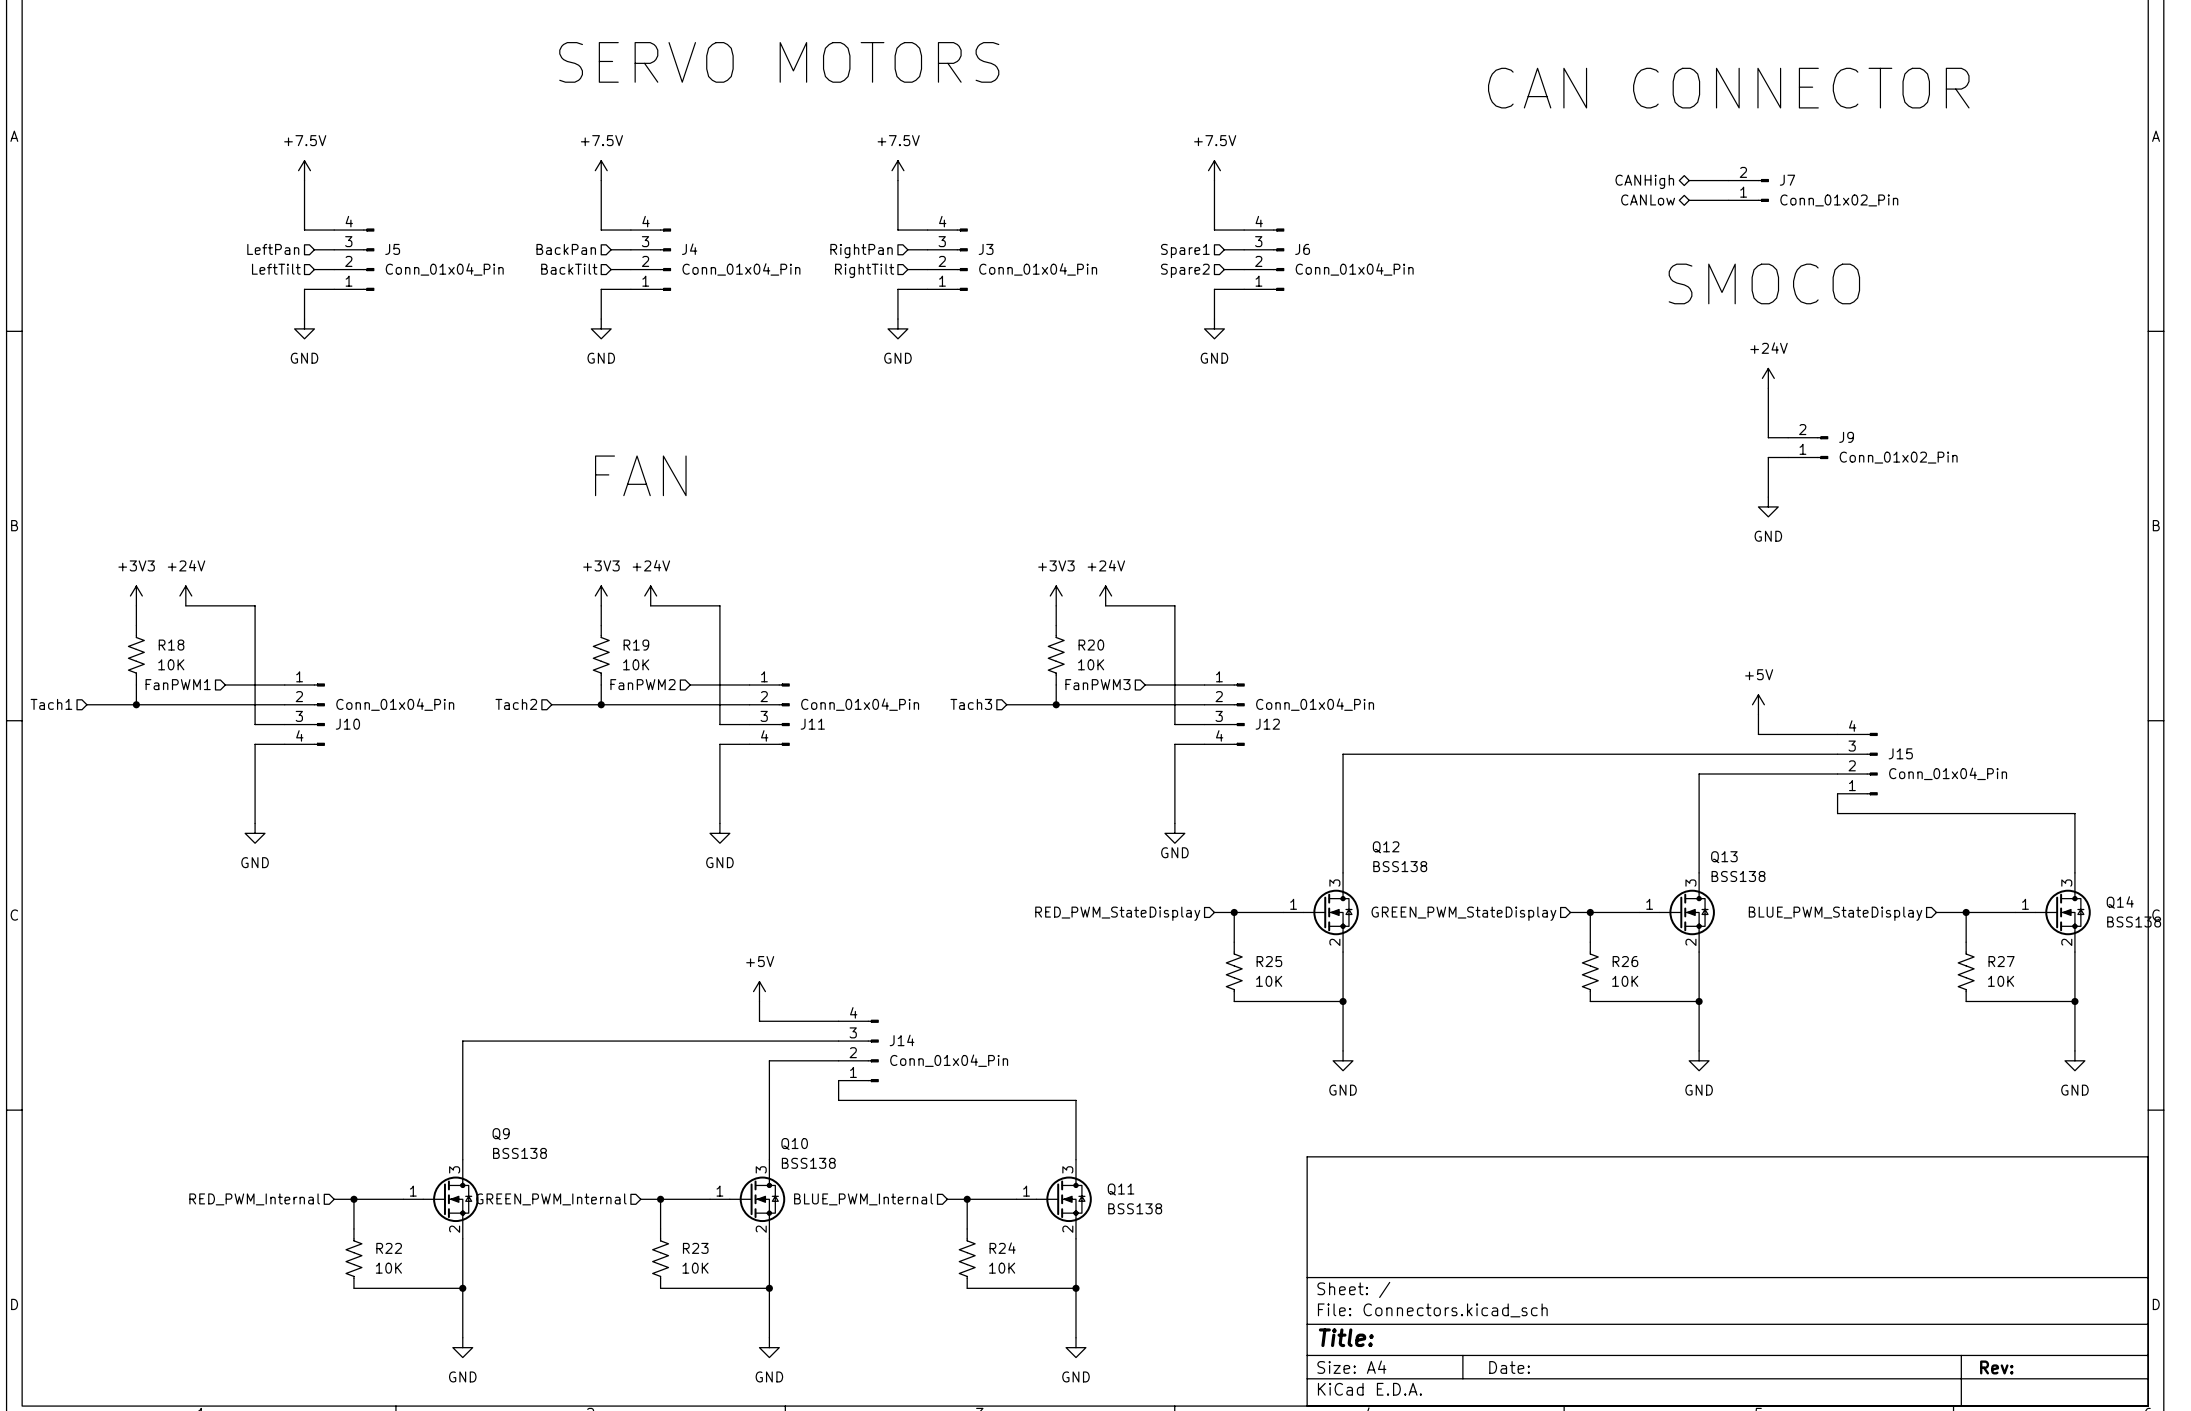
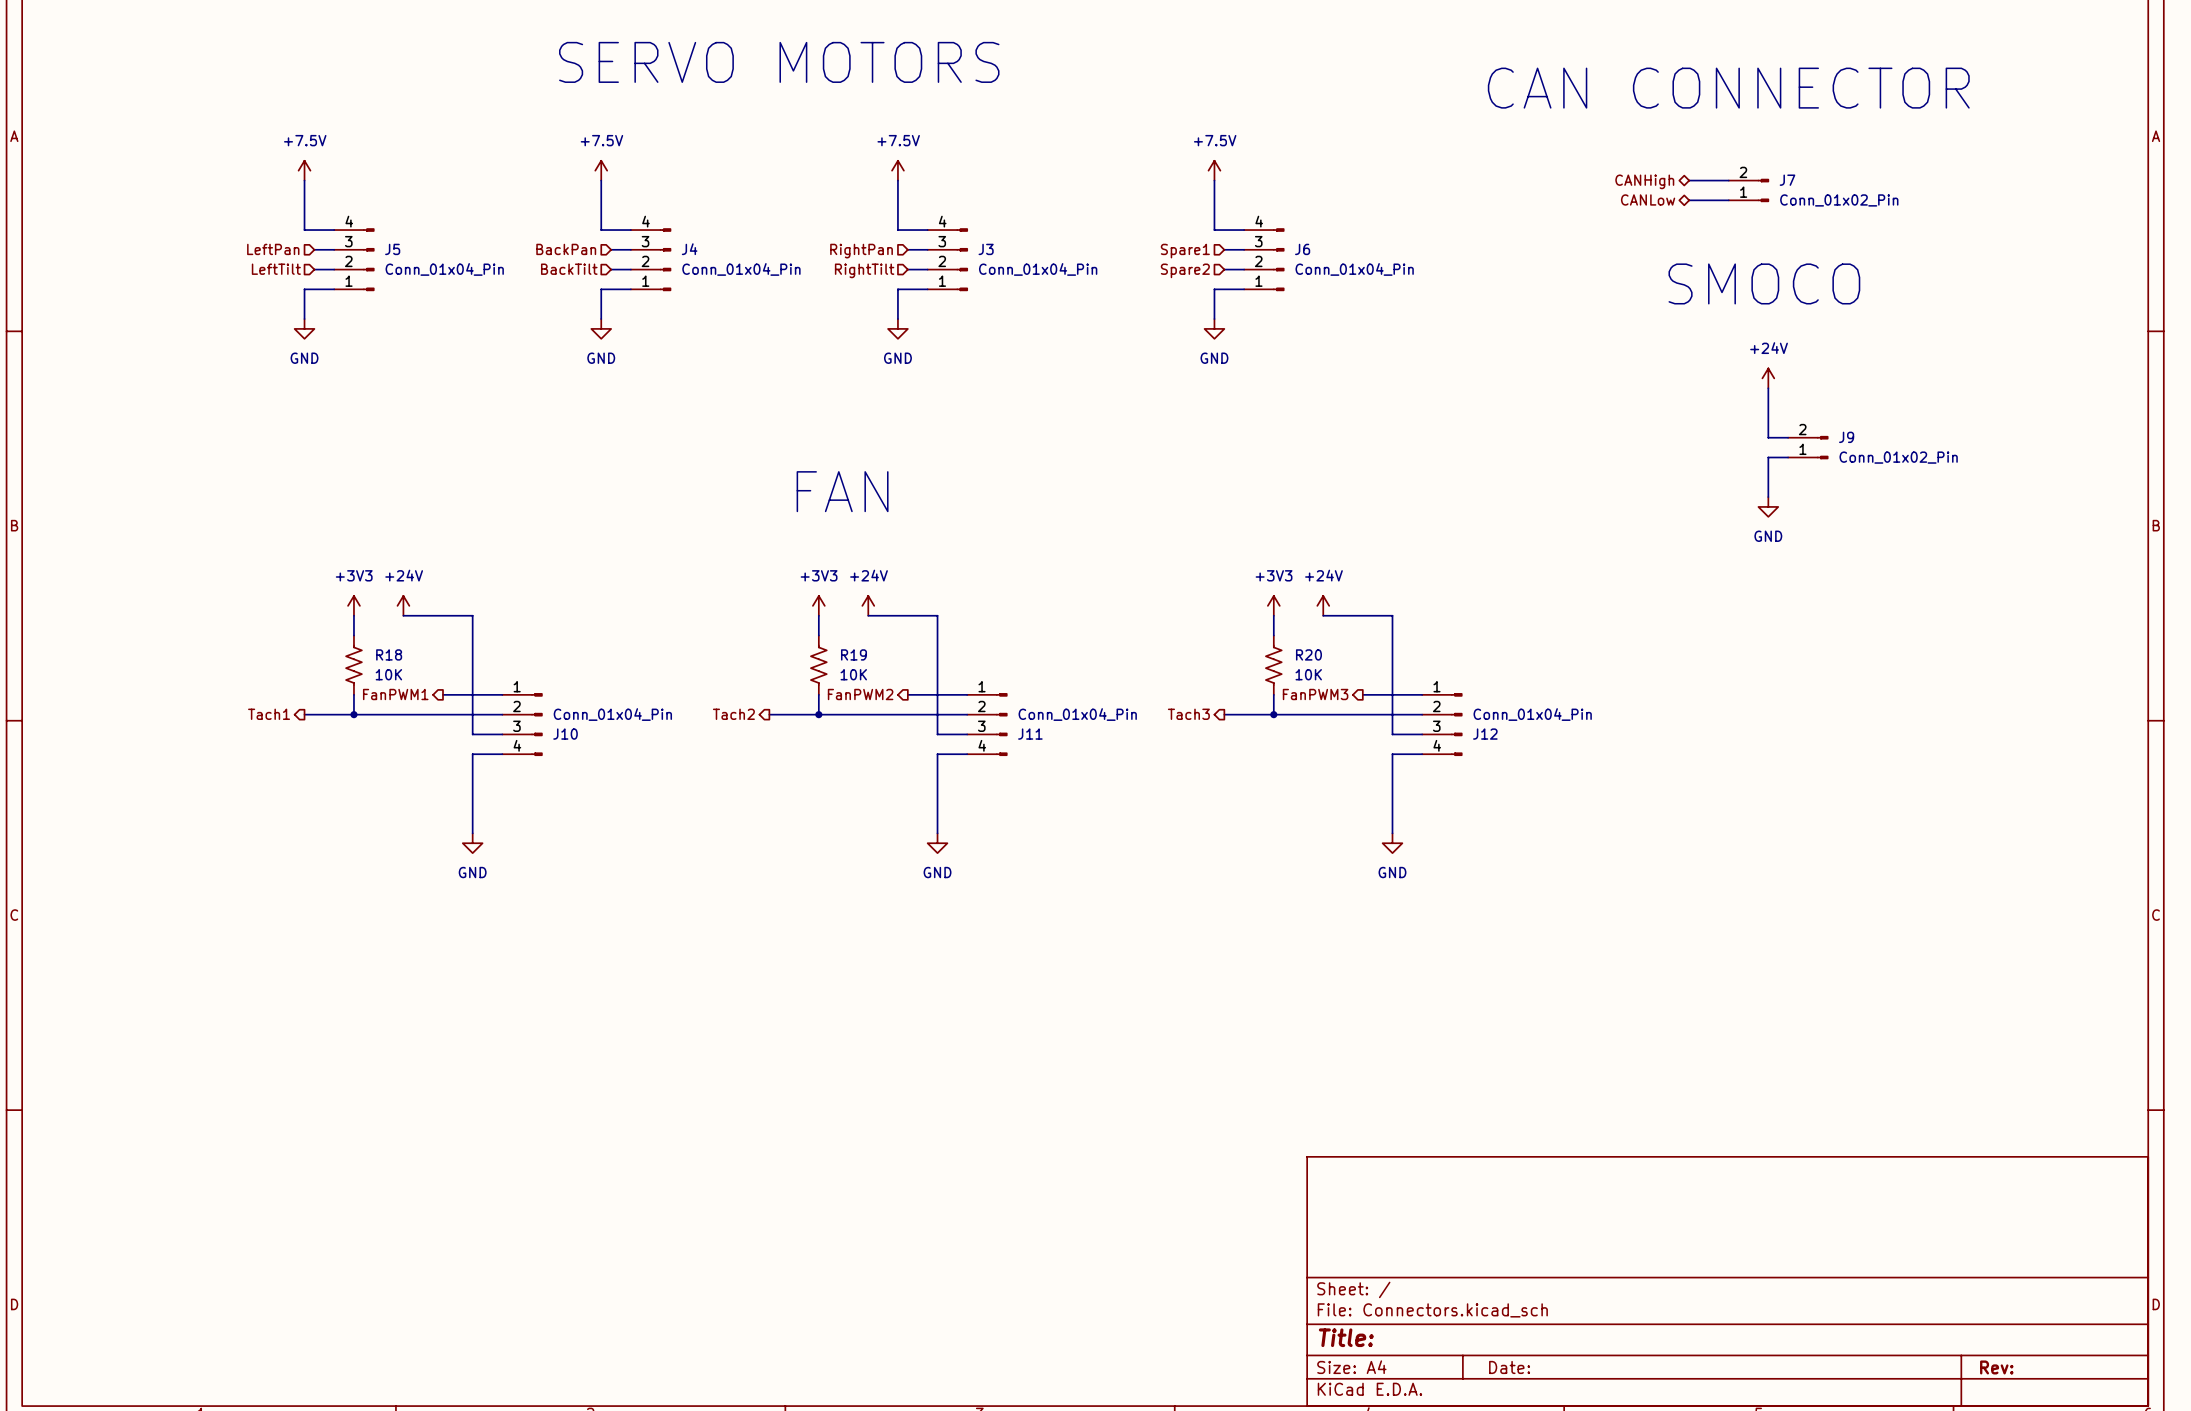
text: FAN (640, 475) -> none
text: none -> FAN (842, 491)
power symbol: +3V3 (136, 595) -> none
power symbol: +24V (185, 595) -> none
power symbol: +3V3 (601, 595) -> none
power symbol: +24V (650, 595) -> none
power symbol: +3V3 (1056, 595) -> none
power symbol: +24V (1105, 595) -> none
wire: (136, 605) (136, 625) -> none
wire: (185, 605) (255, 605) (255, 724) (284, 724) -> none
power symbol: none -> +3V3 (353, 605)
power symbol: none -> +24V (403, 605)
wire: (601, 605) (601, 625) -> none
wire: (650, 605) (719, 605) (719, 724) (749, 724) -> none
power symbol: none -> +3V3 (818, 605)
power symbol: none -> +24V (868, 605)
wire: (1056, 605) (1056, 625) -> none
wire: (1105, 605) (1174, 605) (1174, 724) (1204, 724) -> none
power symbol: none -> +3V3 (1273, 605)
power symbol: none -> +24V (1323, 605)
wire: none -> (353, 615) (353, 635)
wire: none -> (403, 615) (472, 615) (472, 734) (502, 734)
wire: none -> (818, 615) (818, 635)
wire: none -> (868, 615) (937, 615) (937, 734) (967, 734)
wire: none -> (1273, 615) (1273, 635)
wire: none -> (1323, 615) (1392, 615) (1392, 734) (1422, 734)
R18 position: (136, 655) -> (353, 665)
R19 position: (601, 655) -> (818, 665)
R20 position: (1056, 655) -> (1273, 665)
wire: (136, 684) (136, 704) -> none
hierarchical label: FanPWM1 (178, 684) -> none
wire: (225, 684) (284, 684) -> none
wire: (601, 684) (601, 704) -> none
hierarchical label: FanPWM2 (643, 684) -> none
wire: (690, 684) (749, 684) -> none
wire: (1056, 684) (1056, 704) -> none
hierarchical label: FanPWM3 (1097, 684) -> none
wire: (1145, 684) (1204, 684) -> none
wire: none -> (353, 694) (353, 714)
hierarchical label: none -> FanPWM1 (395, 694)
wire: none -> (442, 694) (502, 694)
wire: none -> (818, 694) (818, 714)
hierarchical label: none -> FanPWM2 (860, 694)
wire: none -> (907, 694) (967, 694)
wire: none -> (1273, 694) (1273, 714)
hierarchical label: none -> FanPWM3 (1315, 694)
wire: none -> (1362, 694) (1422, 694)
hierarchical label: Tach1 (51, 704) -> none
wire: (86, 704) (284, 704) -> none
junction: (136, 704) -> none
hierarchical label: Tach2 (516, 704) -> none
wire: (551, 704) (749, 704) -> none
junction: (601, 704) -> none
hierarchical label: Tach3 (971, 704) -> none
wire: (1006, 704) (1204, 704) -> none
junction: (1056, 704) -> none
power symbol: +5V (1758, 704) -> none
hierarchical label: none -> Tach1 (269, 714)
wire: none -> (304, 714) (502, 714)
J10 position: (304, 714) -> (522, 724)
junction: none -> (353, 714)
hierarchical label: none -> Tach2 (733, 714)
wire: none -> (769, 714) (967, 714)
J11 position: (769, 714) -> (987, 724)
junction: none -> (818, 714)
hierarchical label: none -> Tach3 (1188, 714)
wire: none -> (1224, 714) (1422, 714)
J12 position: (1224, 714) -> (1442, 724)
junction: none -> (1273, 714)
wire: (1758, 714) (1758, 734) (1837, 734) -> none
wire: (284, 744) (255, 744) (255, 823) -> none
wire: (749, 744) (719, 744) (719, 823) -> none
wire: (1204, 744) (1174, 744) (1174, 823) -> none
wire: none -> (502, 754) (472, 754) (472, 833)
wire: none -> (967, 754) (937, 754) (937, 833)
wire: (1392, 754) (1343, 754) (1343, 872) -> (1392, 754) (1392, 833)
wire: (1422, 754) (1837, 754) -> none
J15: Conn_01x04_Pin (1857, 764) -> none
wire: (1837, 774) (1699, 774) (1699, 872) -> none
wire: (1837, 793) (1837, 813) (2074, 813) (2074, 872) -> none
power symbol: GND (255, 833) -> none
power symbol: GND (719, 833) -> none
power symbol: GND (1174, 833) -> none
power symbol: none -> GND (472, 843)
power symbol: none -> GND (937, 843)
power symbol: none -> GND (1392, 843)
wire: (1214, 912) (1283, 912) -> none
wire: (1234, 912) (1234, 942) -> none
junction: (1234, 912) -> none
Q12: BSS138 (1321, 912) -> none
wire: (1570, 912) (1639, 912) -> none
wire: (1590, 912) (1590, 942) -> none
junction: (1590, 912) -> none
Q13: BSS138 (1677, 912) -> none
wire: (1936, 912) (2015, 912) -> none
wire: (1966, 912) (1966, 942) -> none
junction: (1966, 912) -> none
Q14: BSS138 (2053, 912) -> none
hierarchical label: RED_PWM_StateDisplay (1117, 913) -> none
hierarchical label: GREEN_PWM_StateDisplay (1463, 913) -> none
hierarchical label: BLUE_PWM_StateDisplay (1835, 913) -> none
wire: (1343, 952) (1343, 1050) -> none
wire: (1699, 952) (1699, 1050) -> none
wire: (2074, 952) (2074, 1050) -> none
R25: 10K (1234, 971) -> none
R26: 10K (1590, 971) -> none
R27: 10K (1966, 971) -> none
power symbol: +5V (759, 991) -> none
wire: (759, 1001) (759, 1021) (838, 1021) -> none
wire: (1234, 1001) (1343, 1001) -> none
junction: (1343, 1001) -> none
wire: (1590, 1001) (1699, 1001) -> none
junction: (1699, 1001) -> none
wire: (1966, 1001) (2074, 1001) -> none
junction: (2074, 1001) -> none
wire: (838, 1041) (462, 1041) (462, 1159) -> none
J14: Conn_01x04_Pin (858, 1050) -> none
wire: (838, 1060) (769, 1060) (769, 1159) -> none
power symbol: GND (1343, 1060) -> none
power symbol: GND (1699, 1060) -> none
power symbol: GND (2074, 1060) -> none
wire: (838, 1080) (838, 1100) (1075, 1100) (1075, 1159) -> none
hierarchical label: RED_PWM_Internal (254, 1199) -> none
wire: (334, 1199) (403, 1199) -> none
wire: (353, 1199) (353, 1228) -> none
junction: (353, 1199) -> none
Q9: BSS138 (441, 1199) -> none
hierarchical label: GREEN_PWM_Internal (551, 1199) -> none
wire: (640, 1199) (710, 1199) -> none
wire: (660, 1199) (660, 1228) -> none
junction: (660, 1199) -> none
Q10: BSS138 (747, 1199) -> none
hierarchical label: BLUE_PWM_Internal (863, 1199) -> none
wire: (947, 1199) (1016, 1199) -> none
wire: (967, 1199) (967, 1228) -> none
junction: (967, 1199) -> none
Q11: BSS138 (1054, 1199) -> none
wire: (462, 1238) (462, 1337) -> none
wire: (769, 1238) (769, 1337) -> none
wire: (1075, 1238) (1075, 1337) -> none
R22: 10K (353, 1258) -> none
R23: 10K (660, 1258) -> none
R24: 10K (967, 1258) -> none
wire: (353, 1288) (462, 1288) -> none
junction: (462, 1288) -> none
wire: (660, 1288) (769, 1288) -> none
junction: (769, 1288) -> none
wire: (967, 1288) (1075, 1288) -> none
junction: (1075, 1288) -> none
power symbol: GND (462, 1347) -> none
power symbol: GND (769, 1347) -> none
power symbol: GND (1075, 1347) -> none

